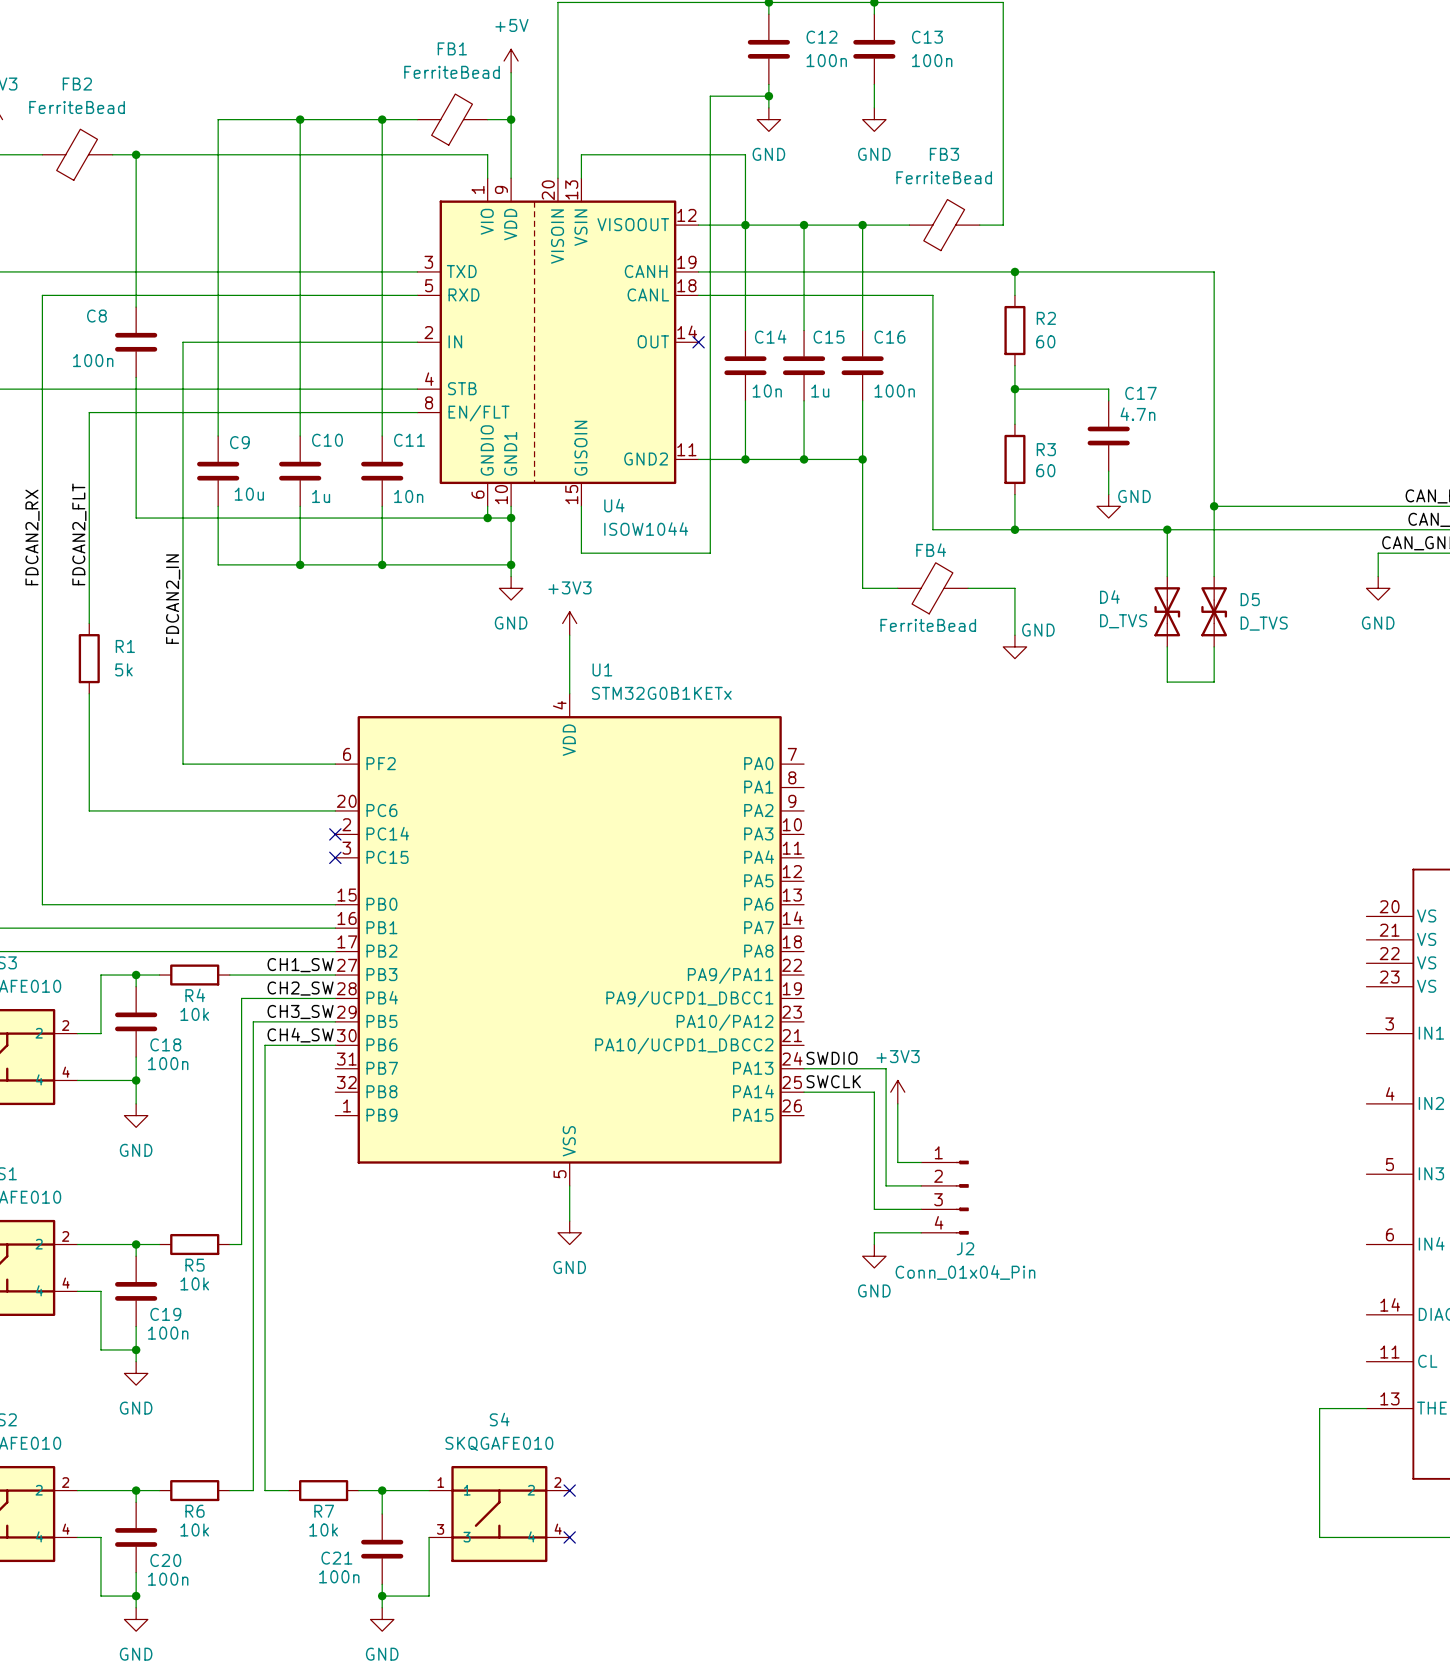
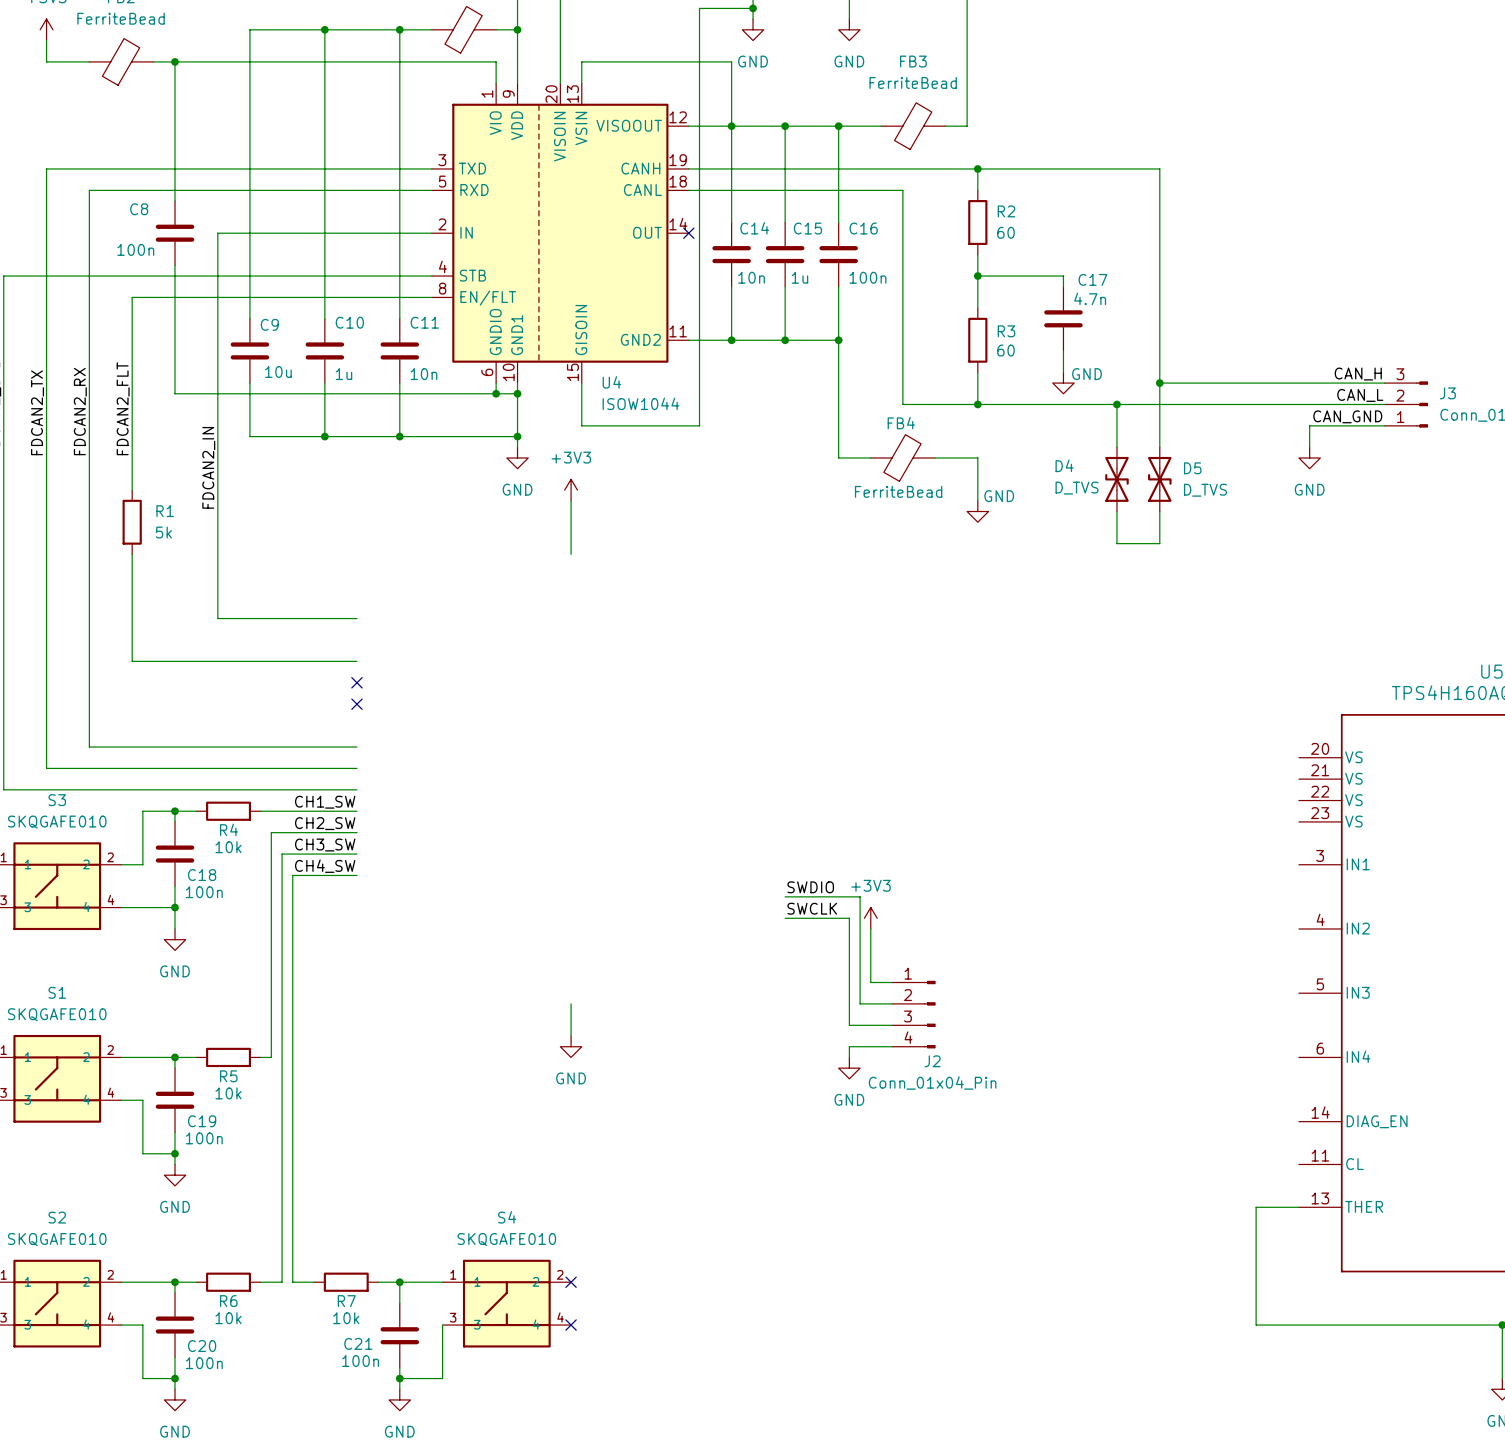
U1: STM32G0B1KETx (569, 939) -> none

